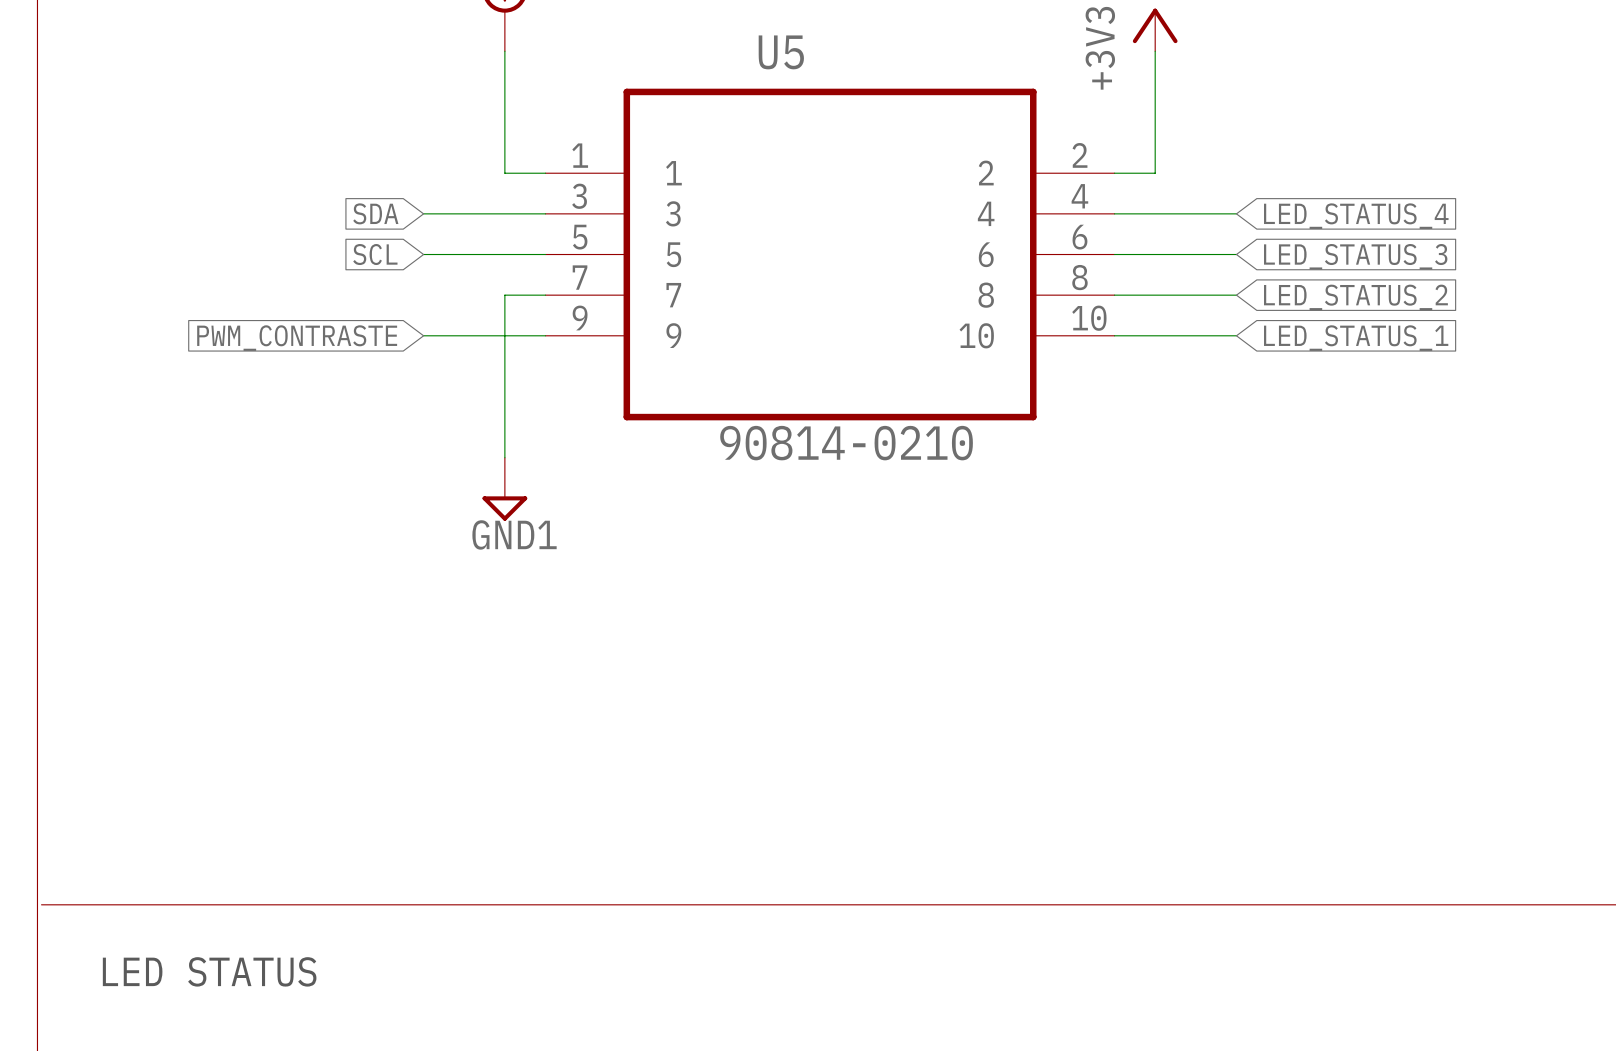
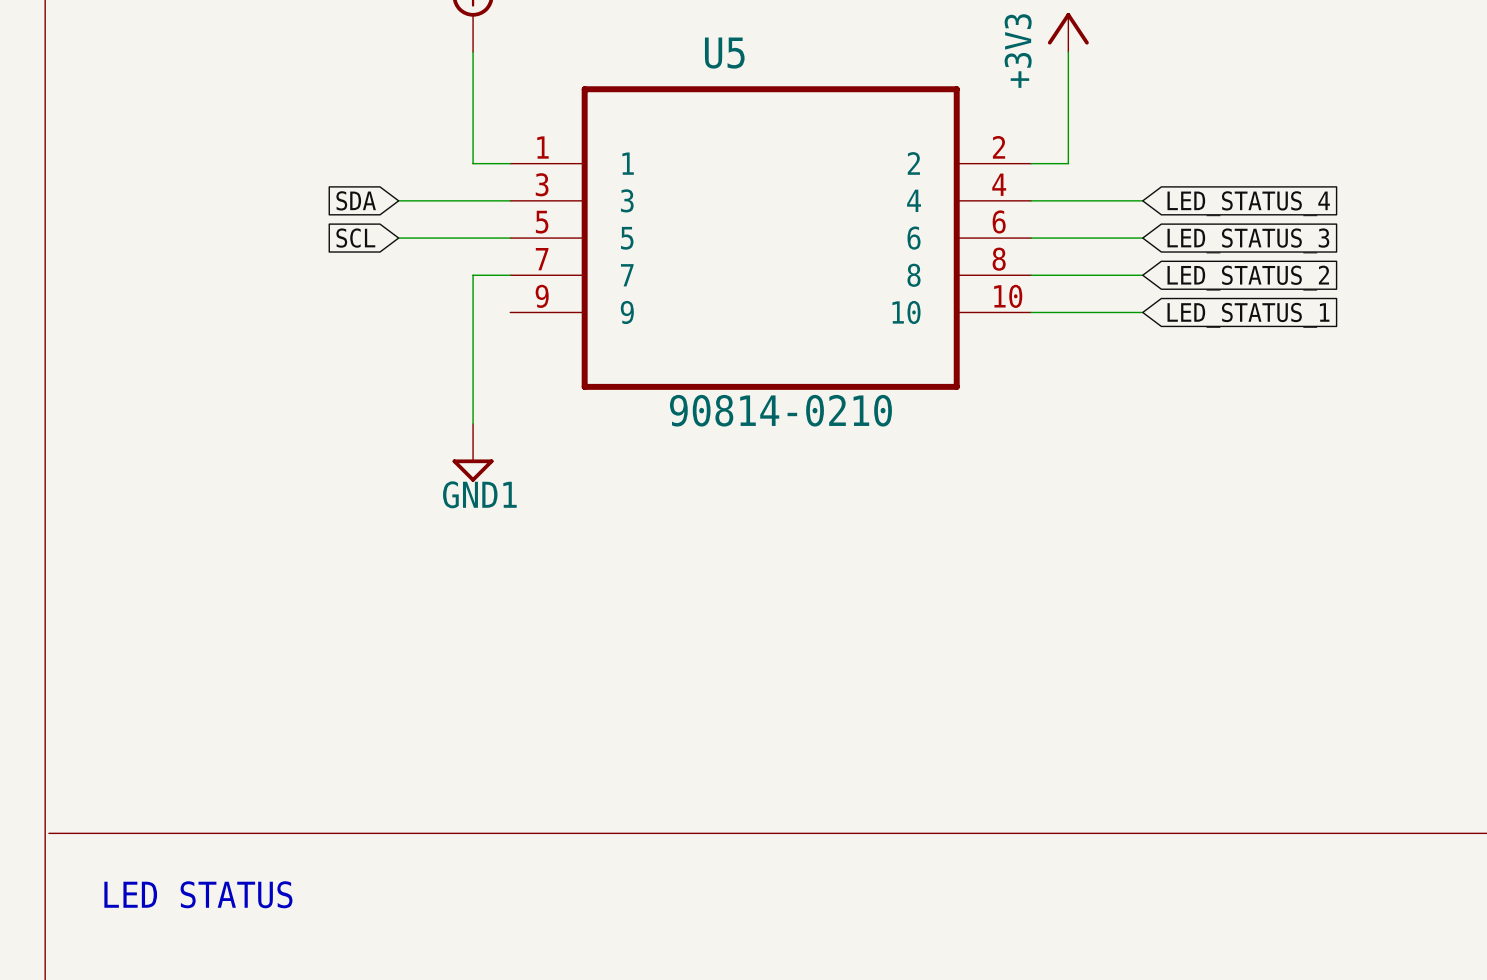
wire: (423, 335) (545, 335) -> none
global label: PWM_CONTRASTE (297, 338) -> none

